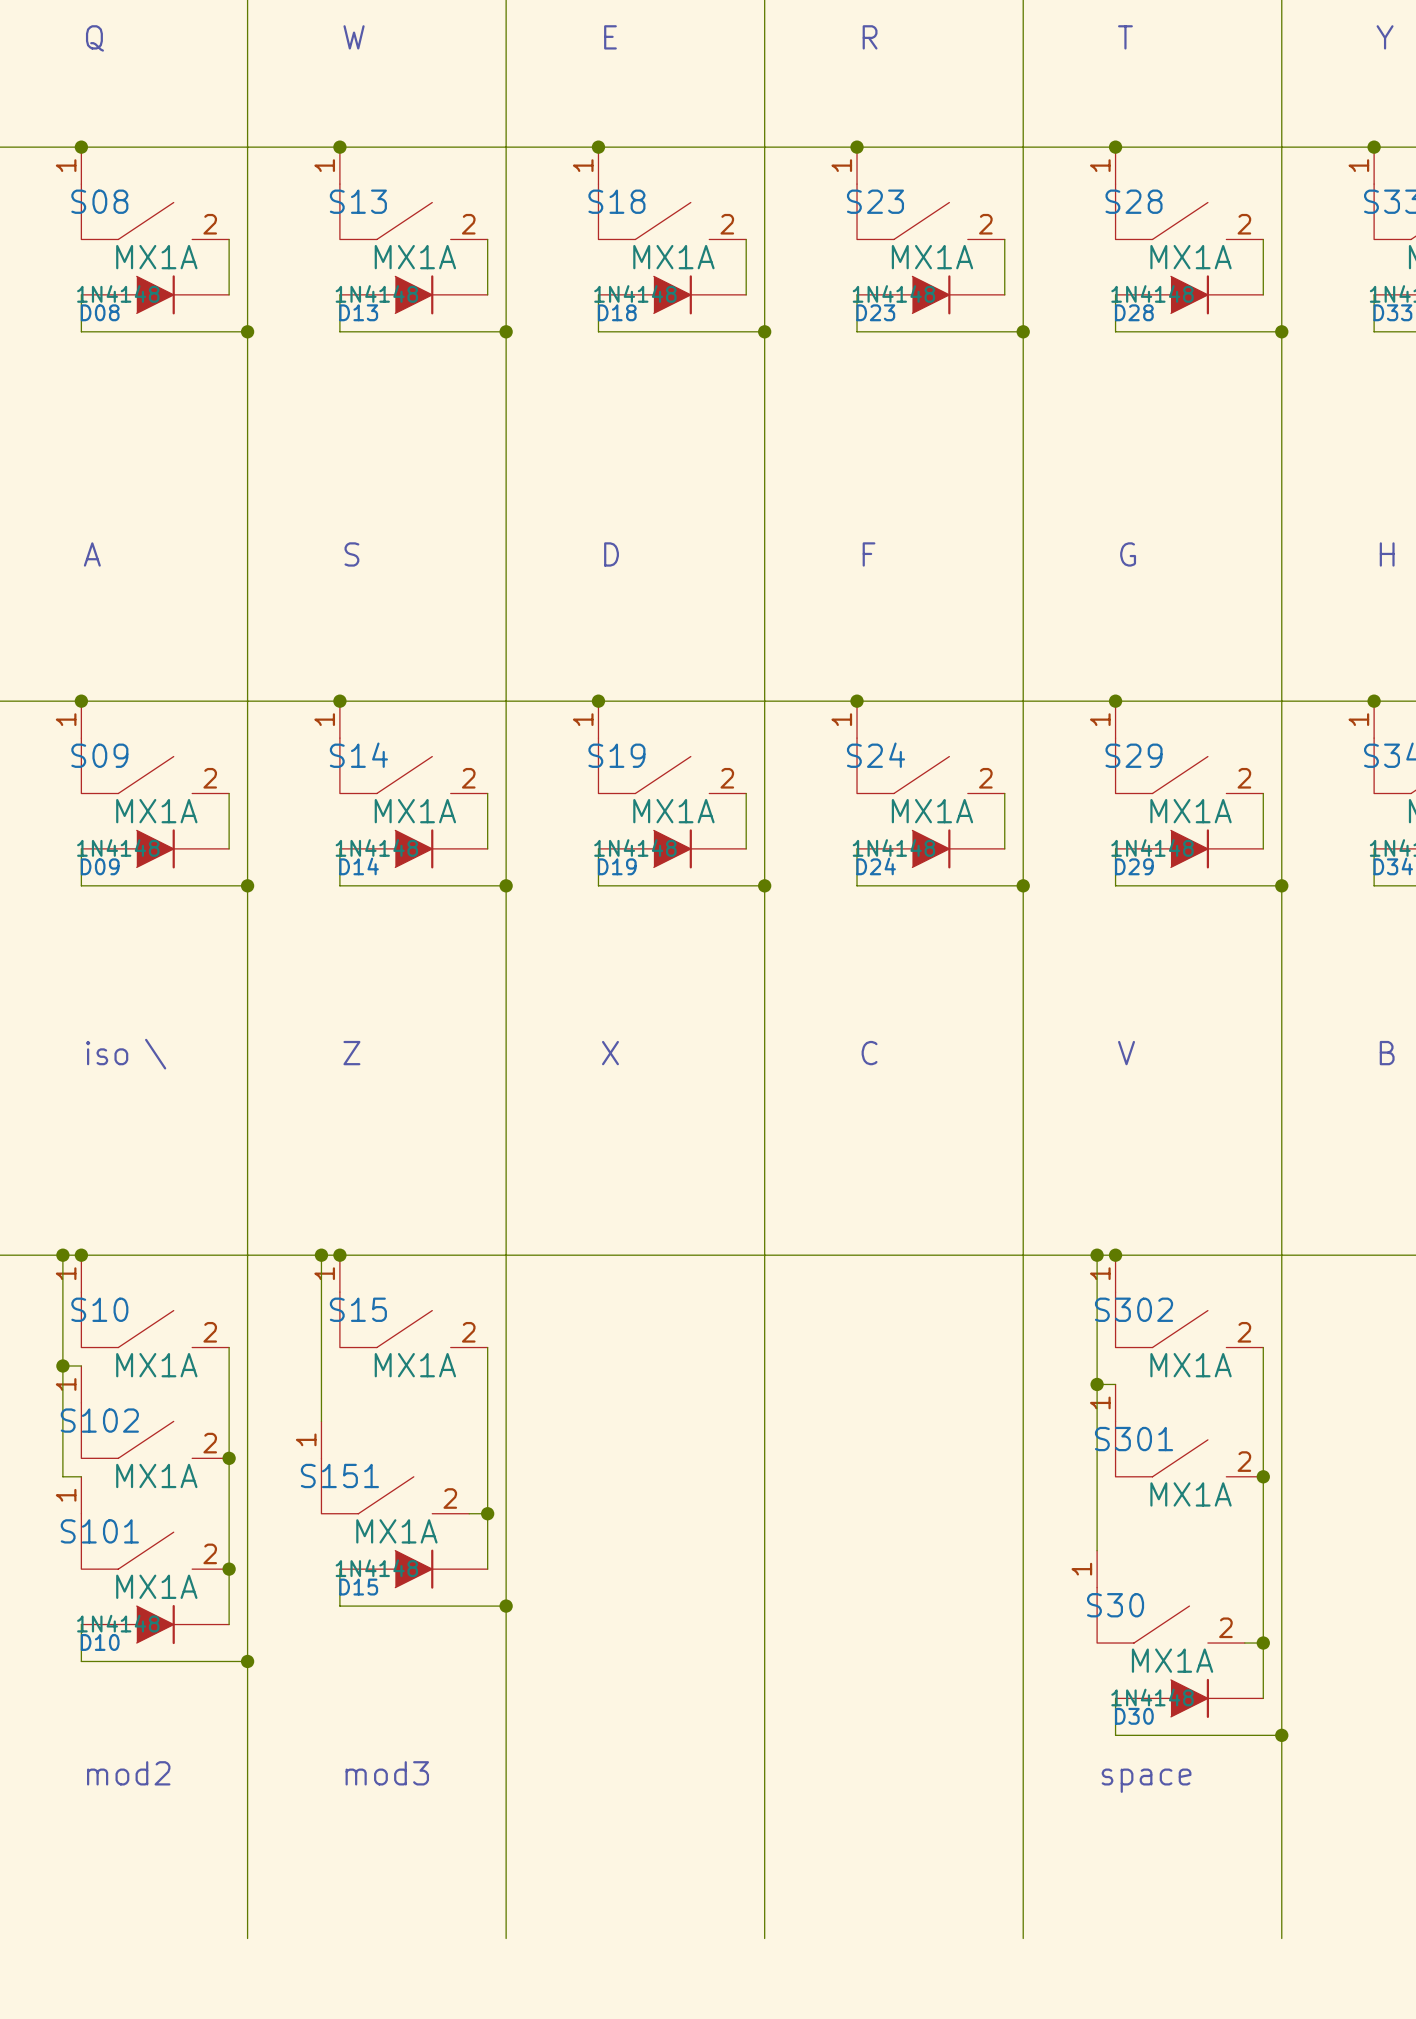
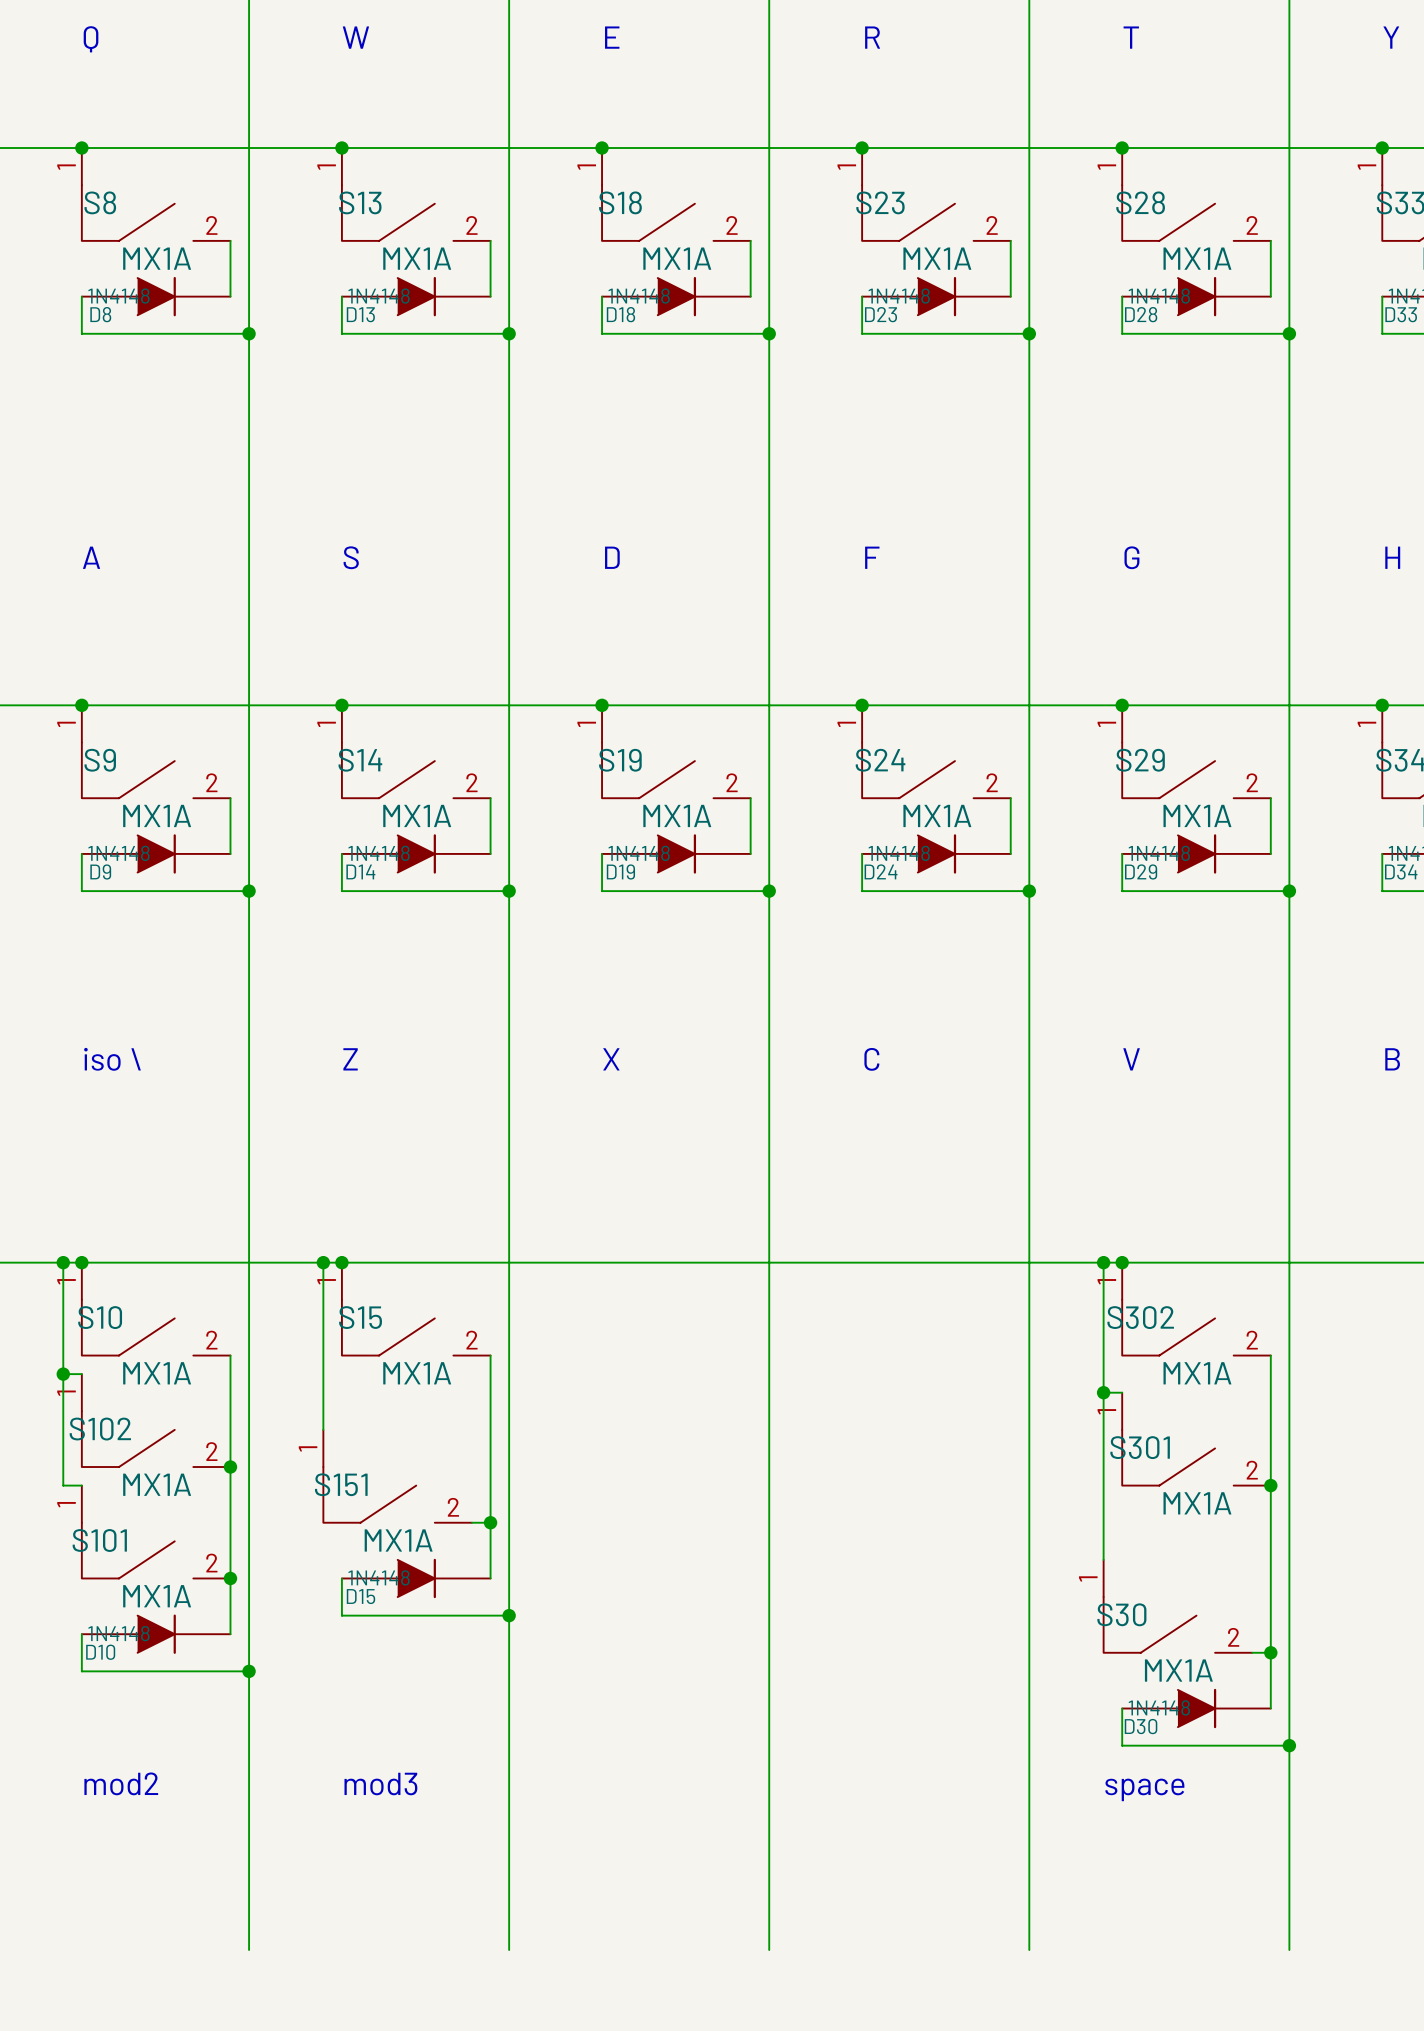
S08 name: S08 (99, 201) -> S8 (100, 202)
D08 name: D08 (100, 312) -> D8 (100, 314)
S09 name: S09 (99, 755) -> S9 (100, 760)
D09 name: D09 (100, 866) -> D9 (100, 871)

